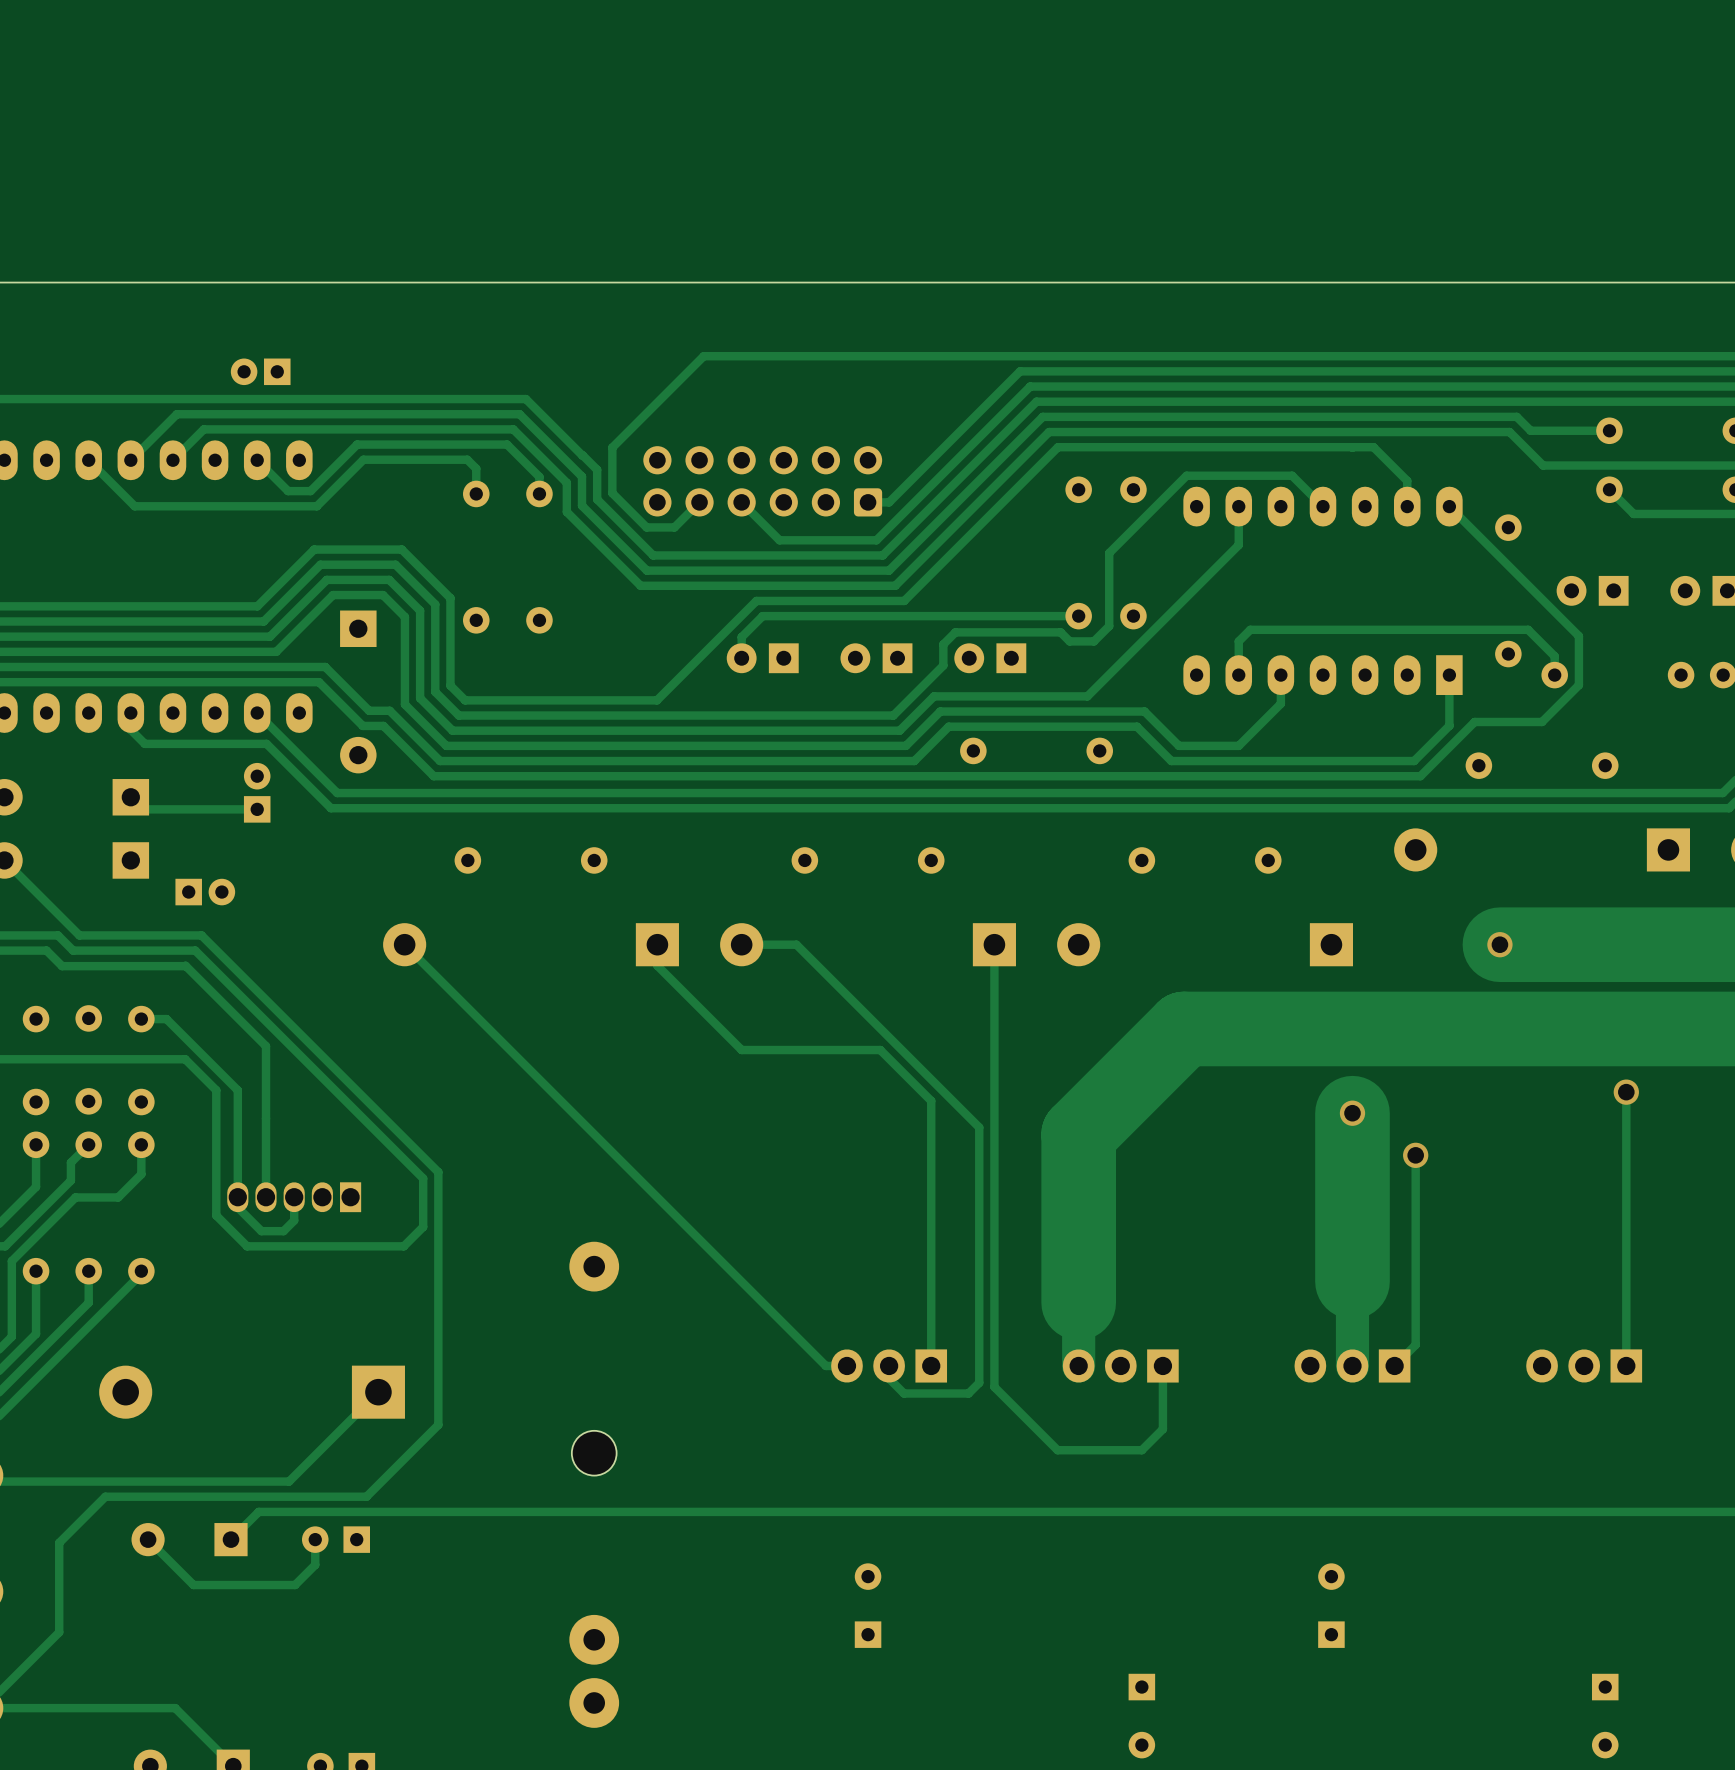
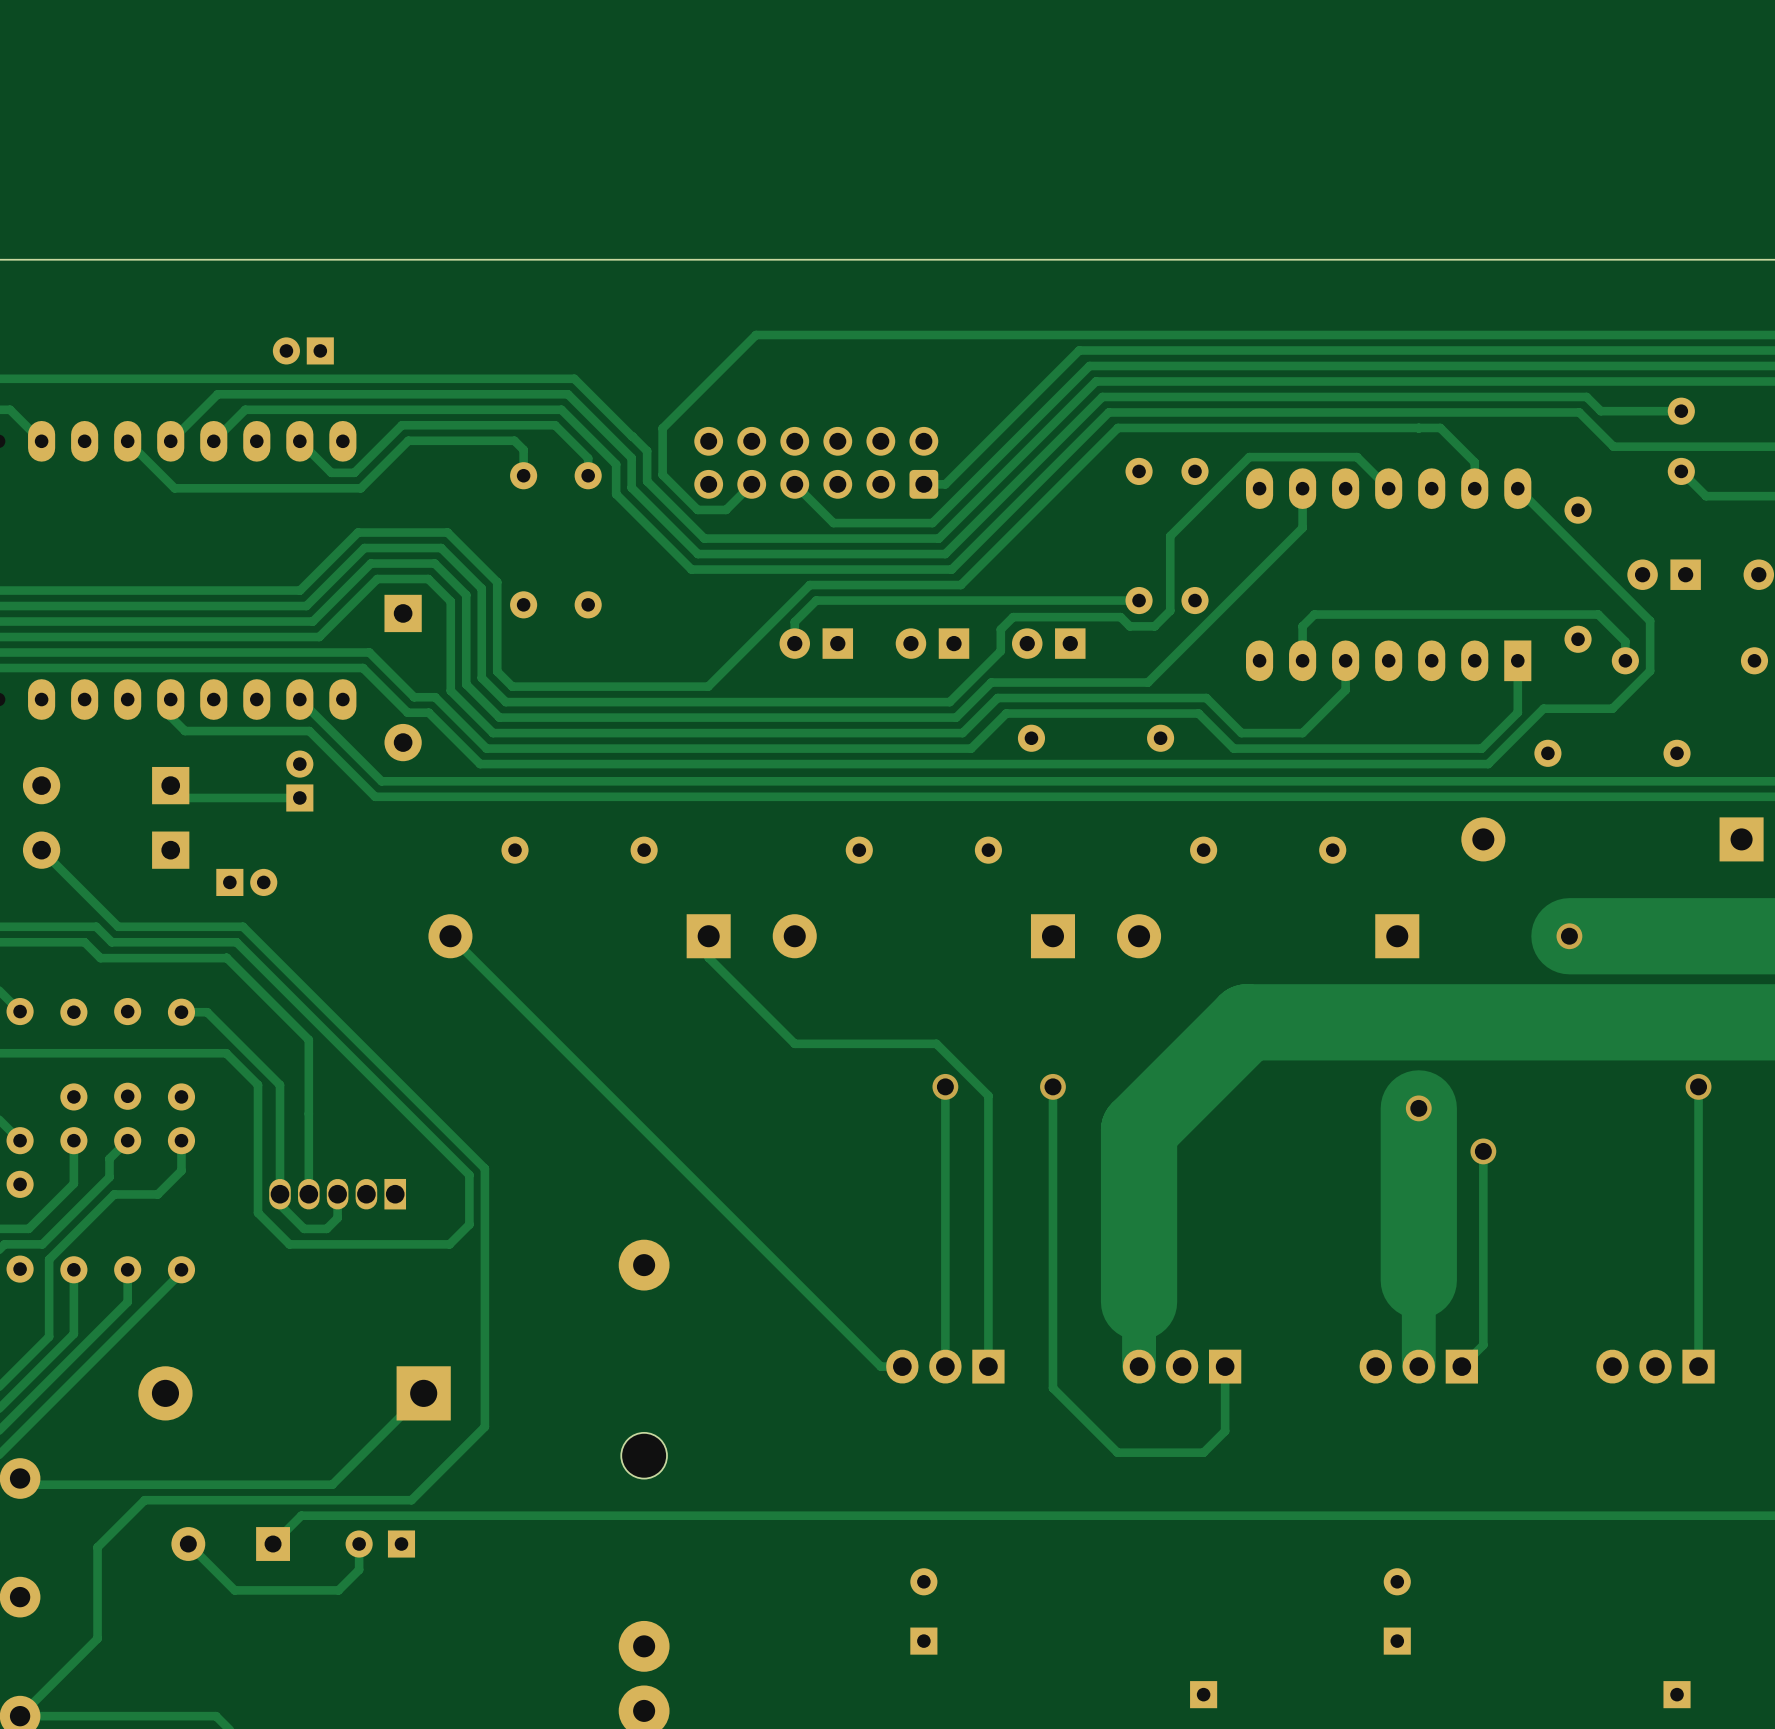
track: (741, 944) (796, 944) (979, 1127) (979, 1382) (968, 1393) (904, 1393) (889, 1378) (889, 1365) -> (945, 1086) (945, 1366)
track: (994, 944) (994, 1092) -> none
via: none -> (945, 1086)
via: none -> (1052, 1086)

